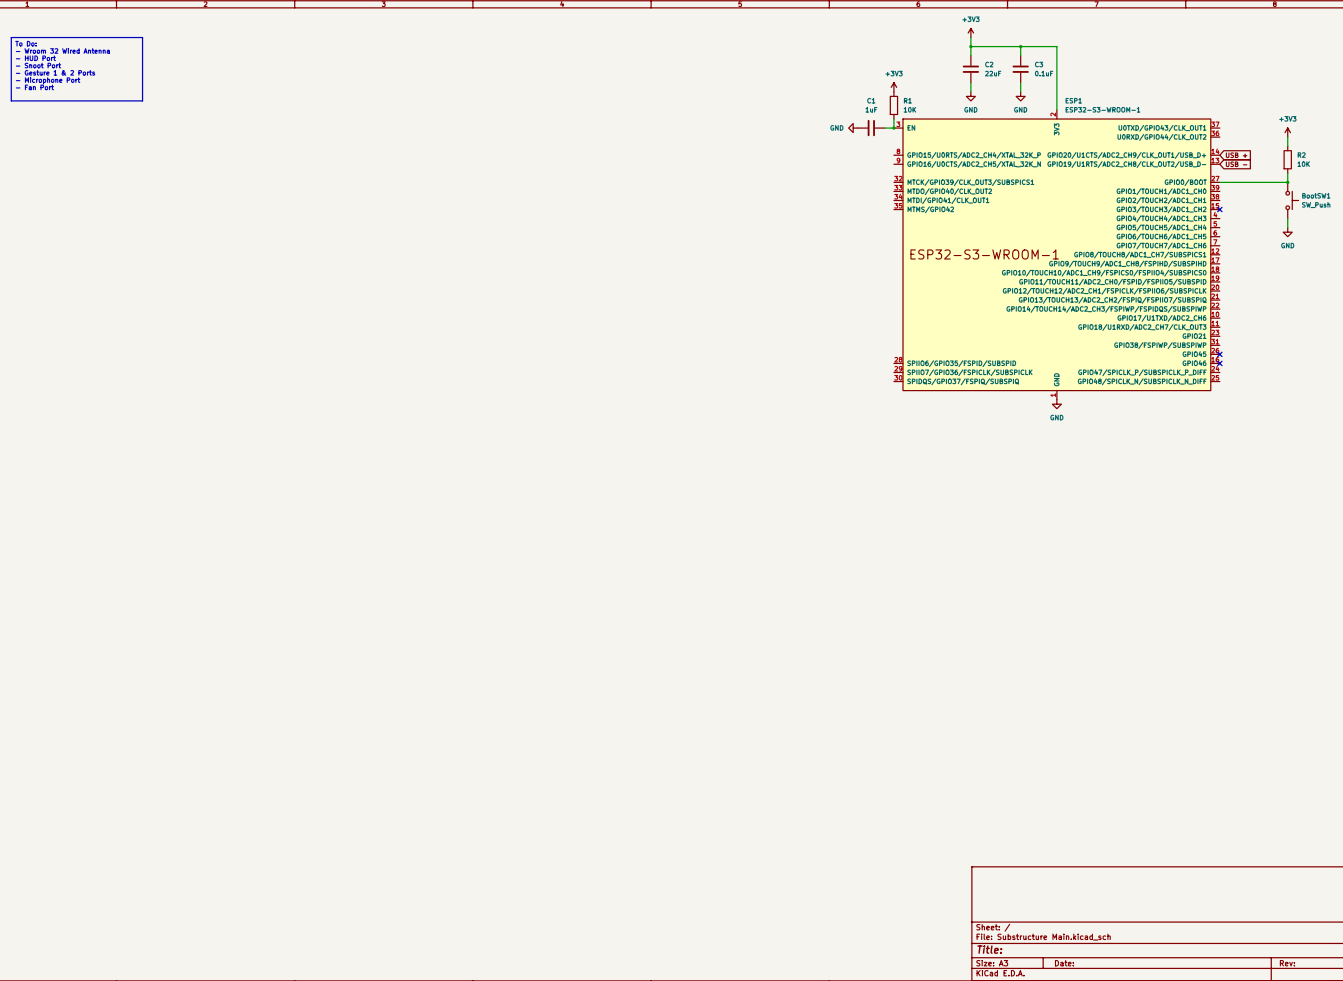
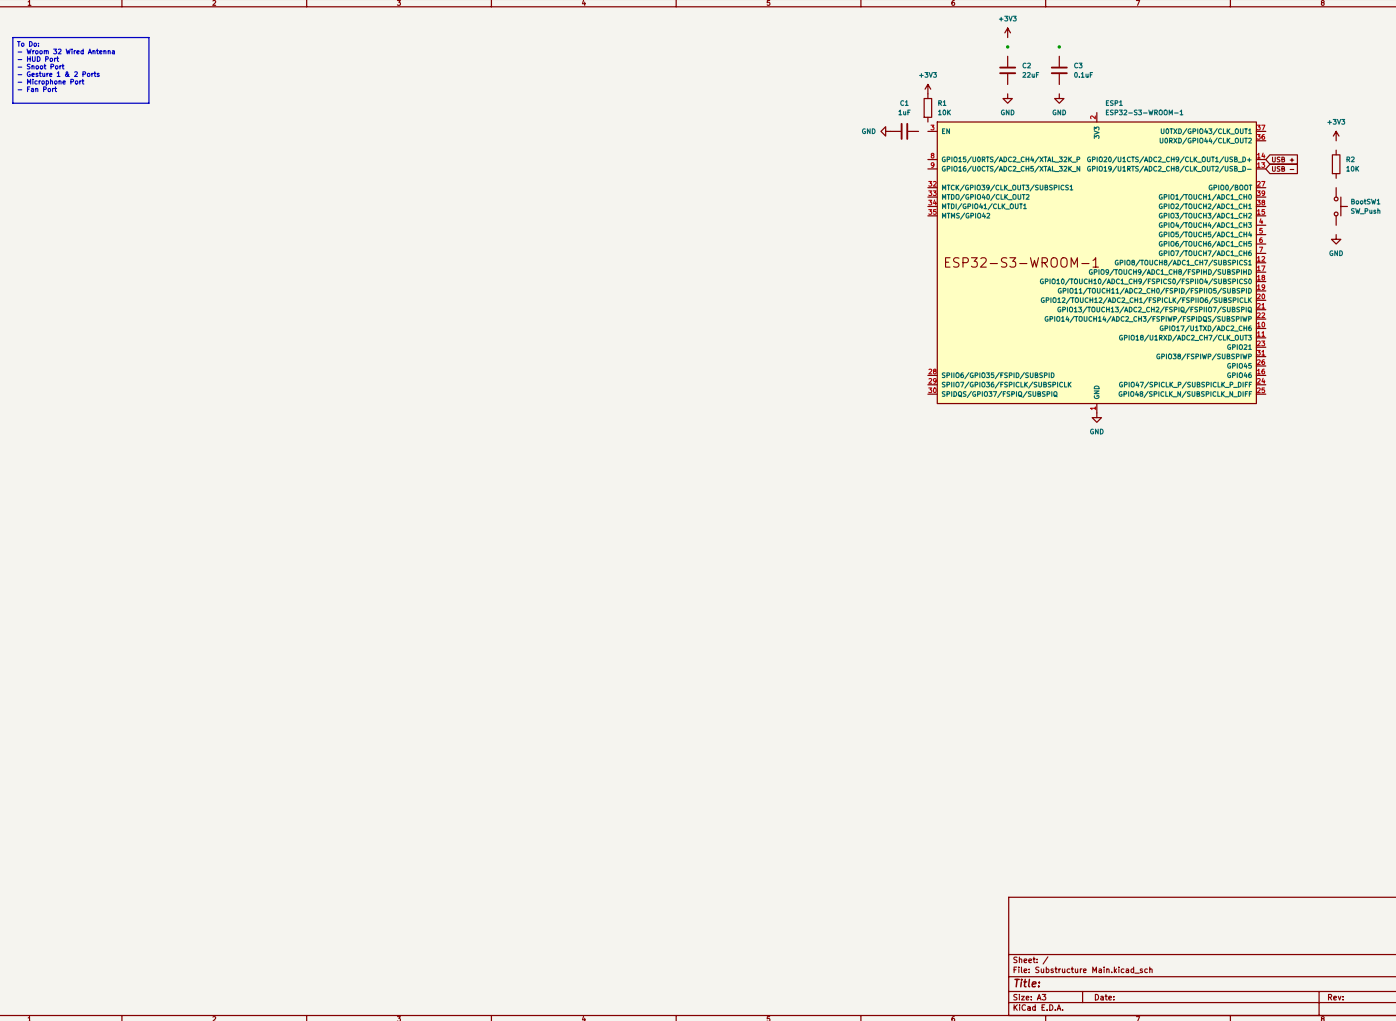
wire: (970, 37) (970, 55) -> none
wire: (970, 46) (1056, 46) (1056, 109) -> none
wire: (1020, 46) (1020, 55) -> none
wire: (970, 82) (970, 91) -> none
wire: (1020, 82) (1020, 91) -> none
wire: (893, 119) (893, 128) (884, 128) -> none
junction: (893, 128) -> none
wire: (1287, 137) (1287, 146) -> none
wire: (1287, 173) (1287, 182) (1219, 182) -> none
junction: (1287, 182) -> none
no-connect mark: (1219, 209) -> none
wire: (1287, 218) (1287, 227) -> none
no-connect mark: (1219, 354) -> none
no-connect mark: (1219, 363) -> none

